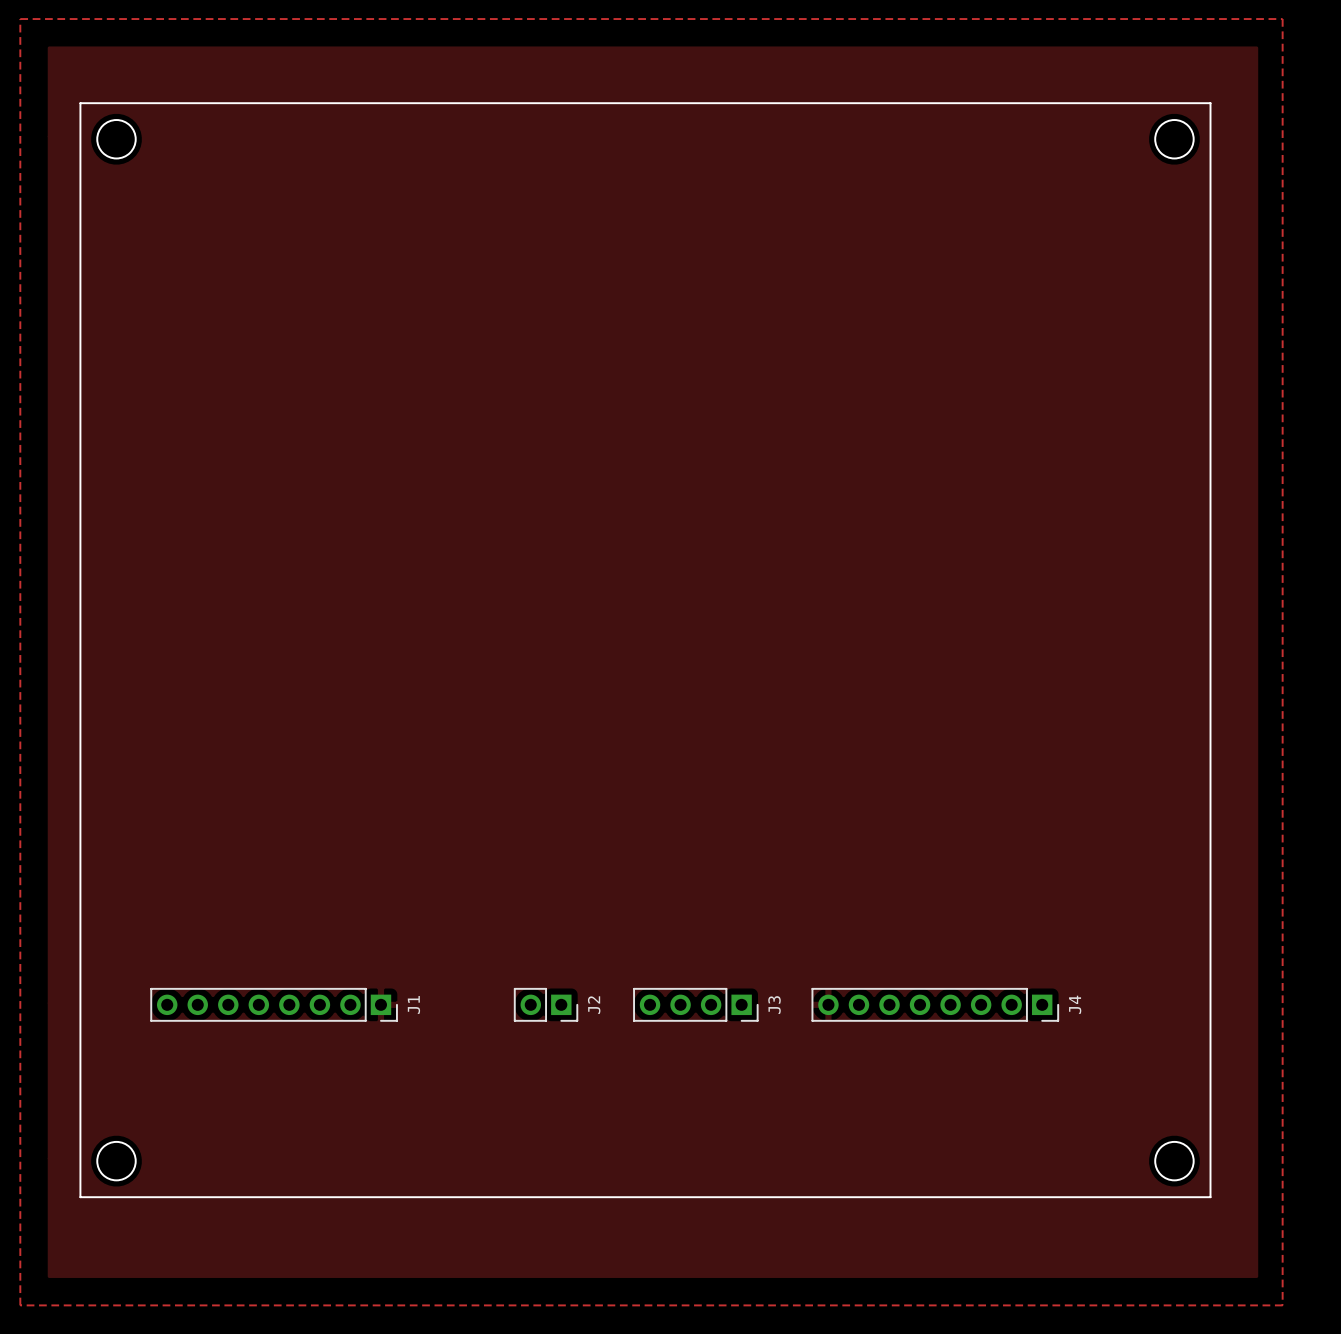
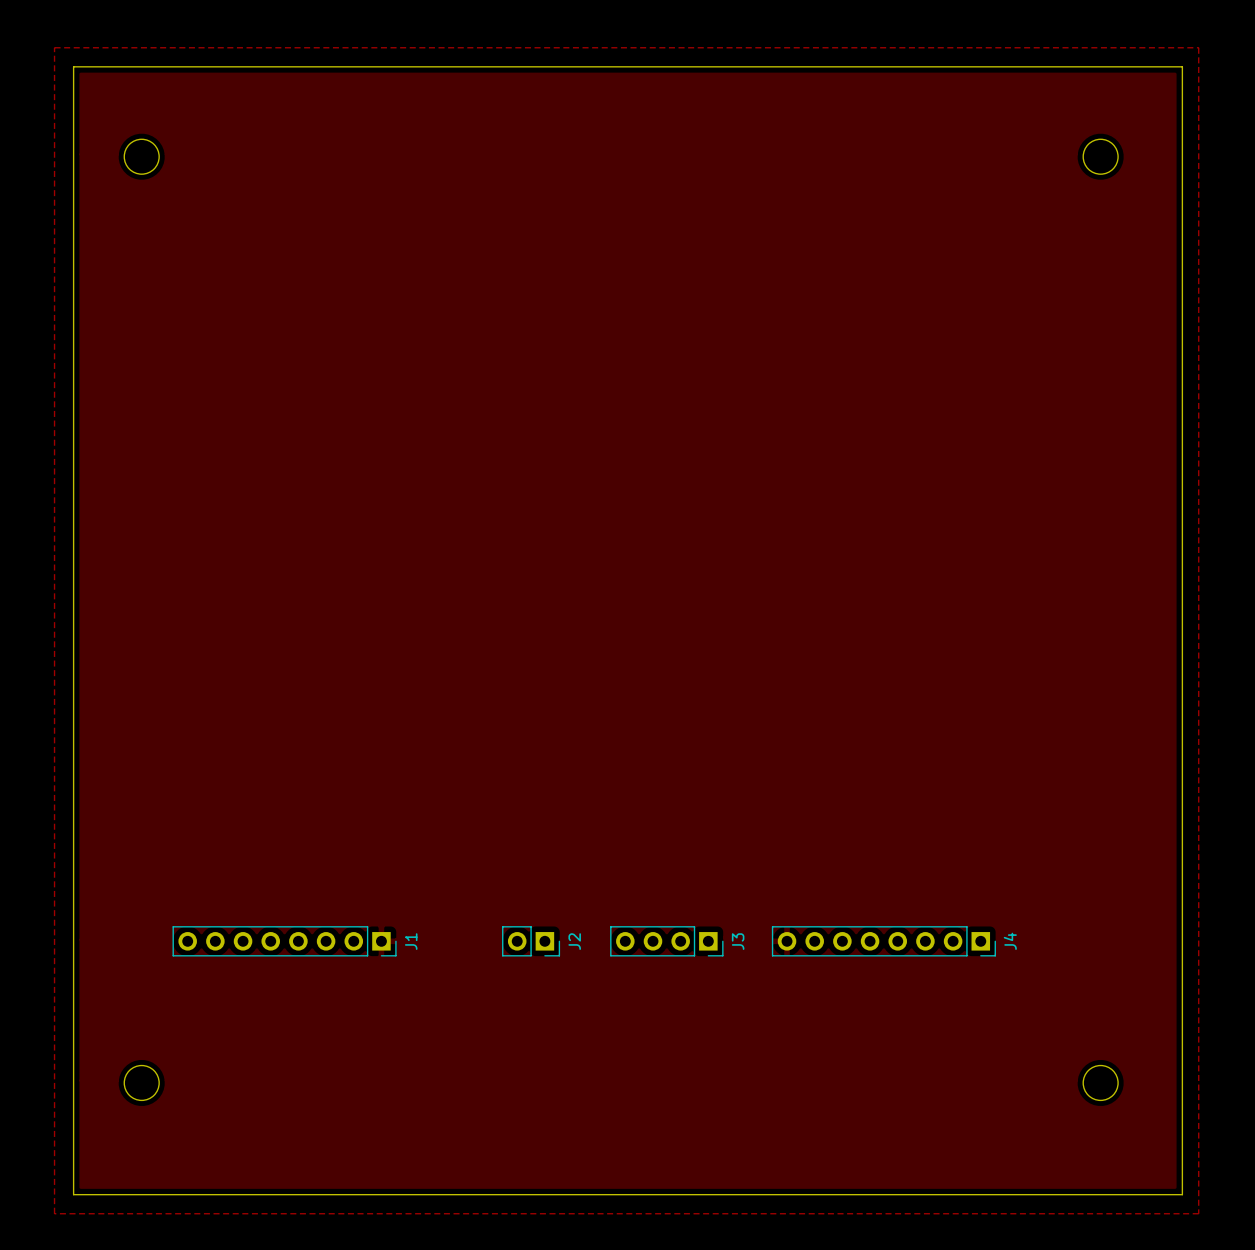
board edge: (80, 103) (80, 1197) (1210, 1197) (1210, 103) (80, 103) -> (73, 66) (73, 1194) (1182, 1194) (1182, 66) (73, 66)

